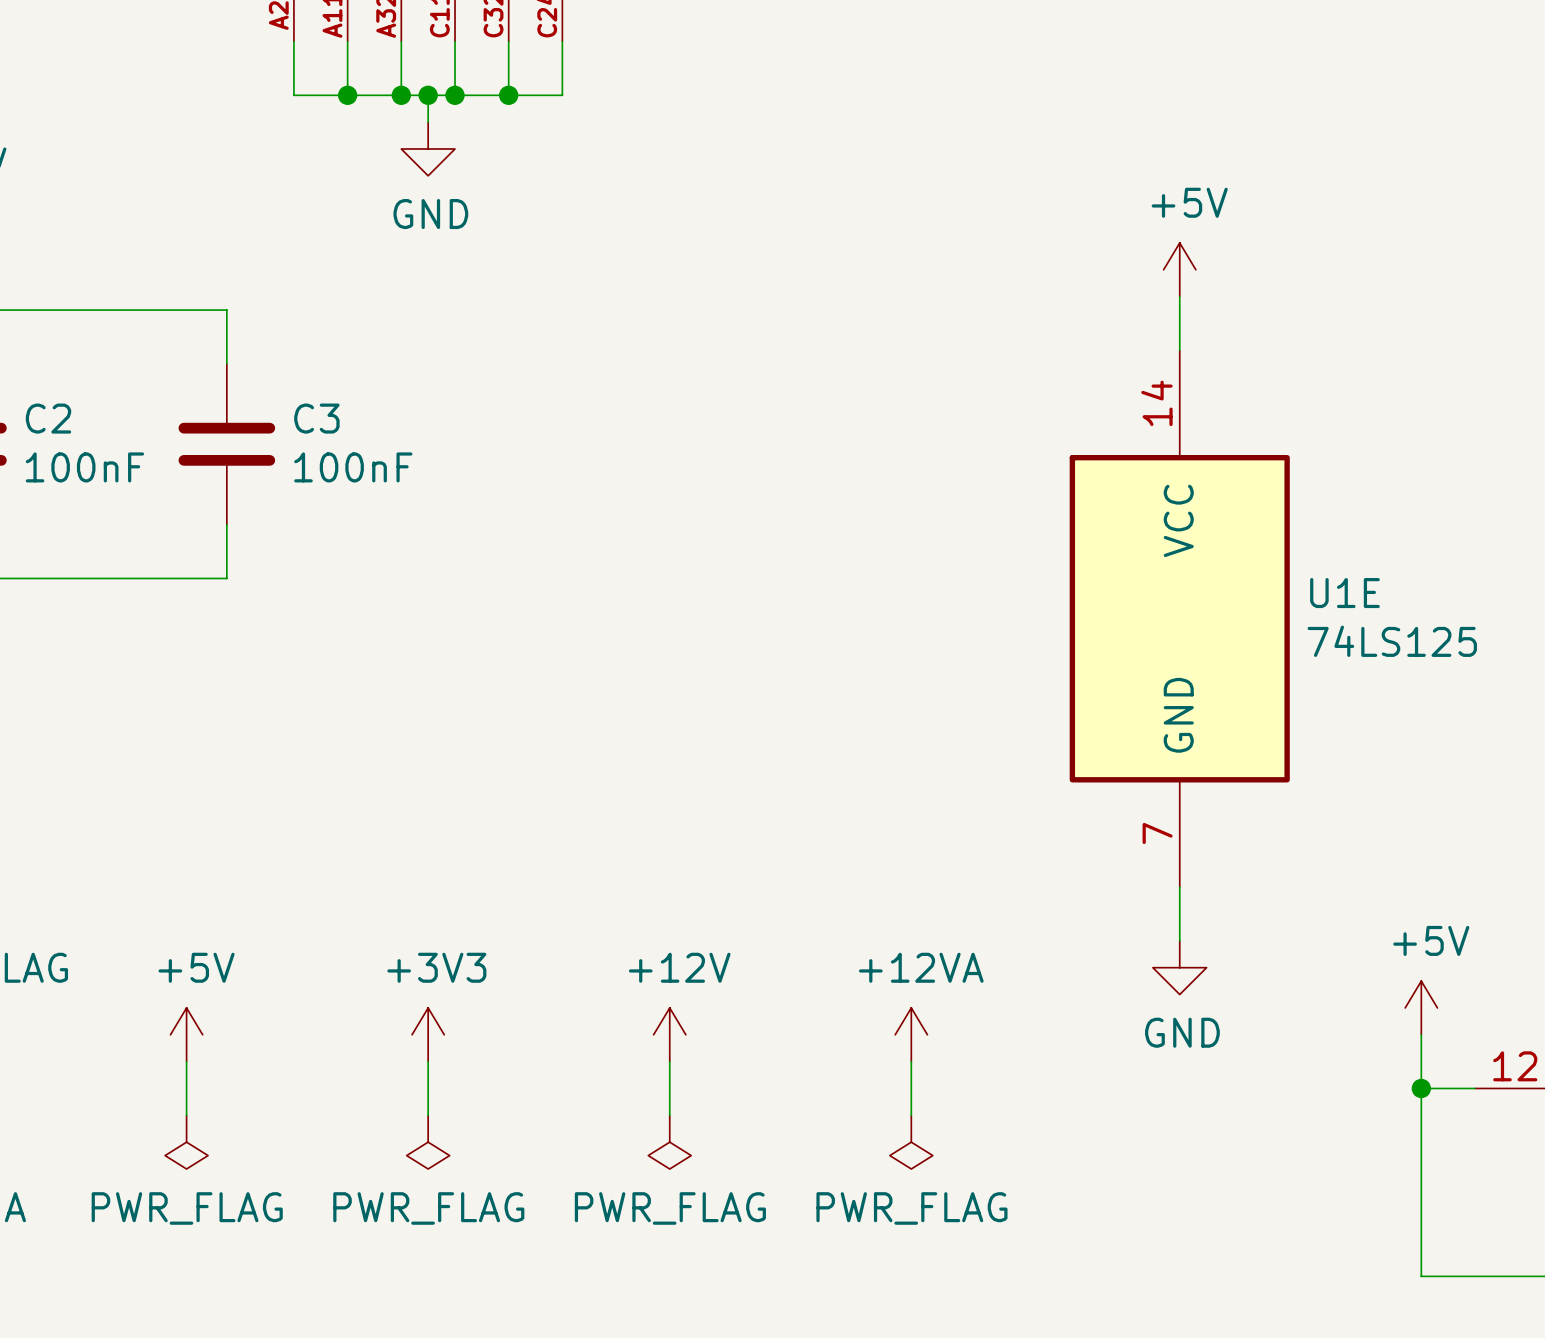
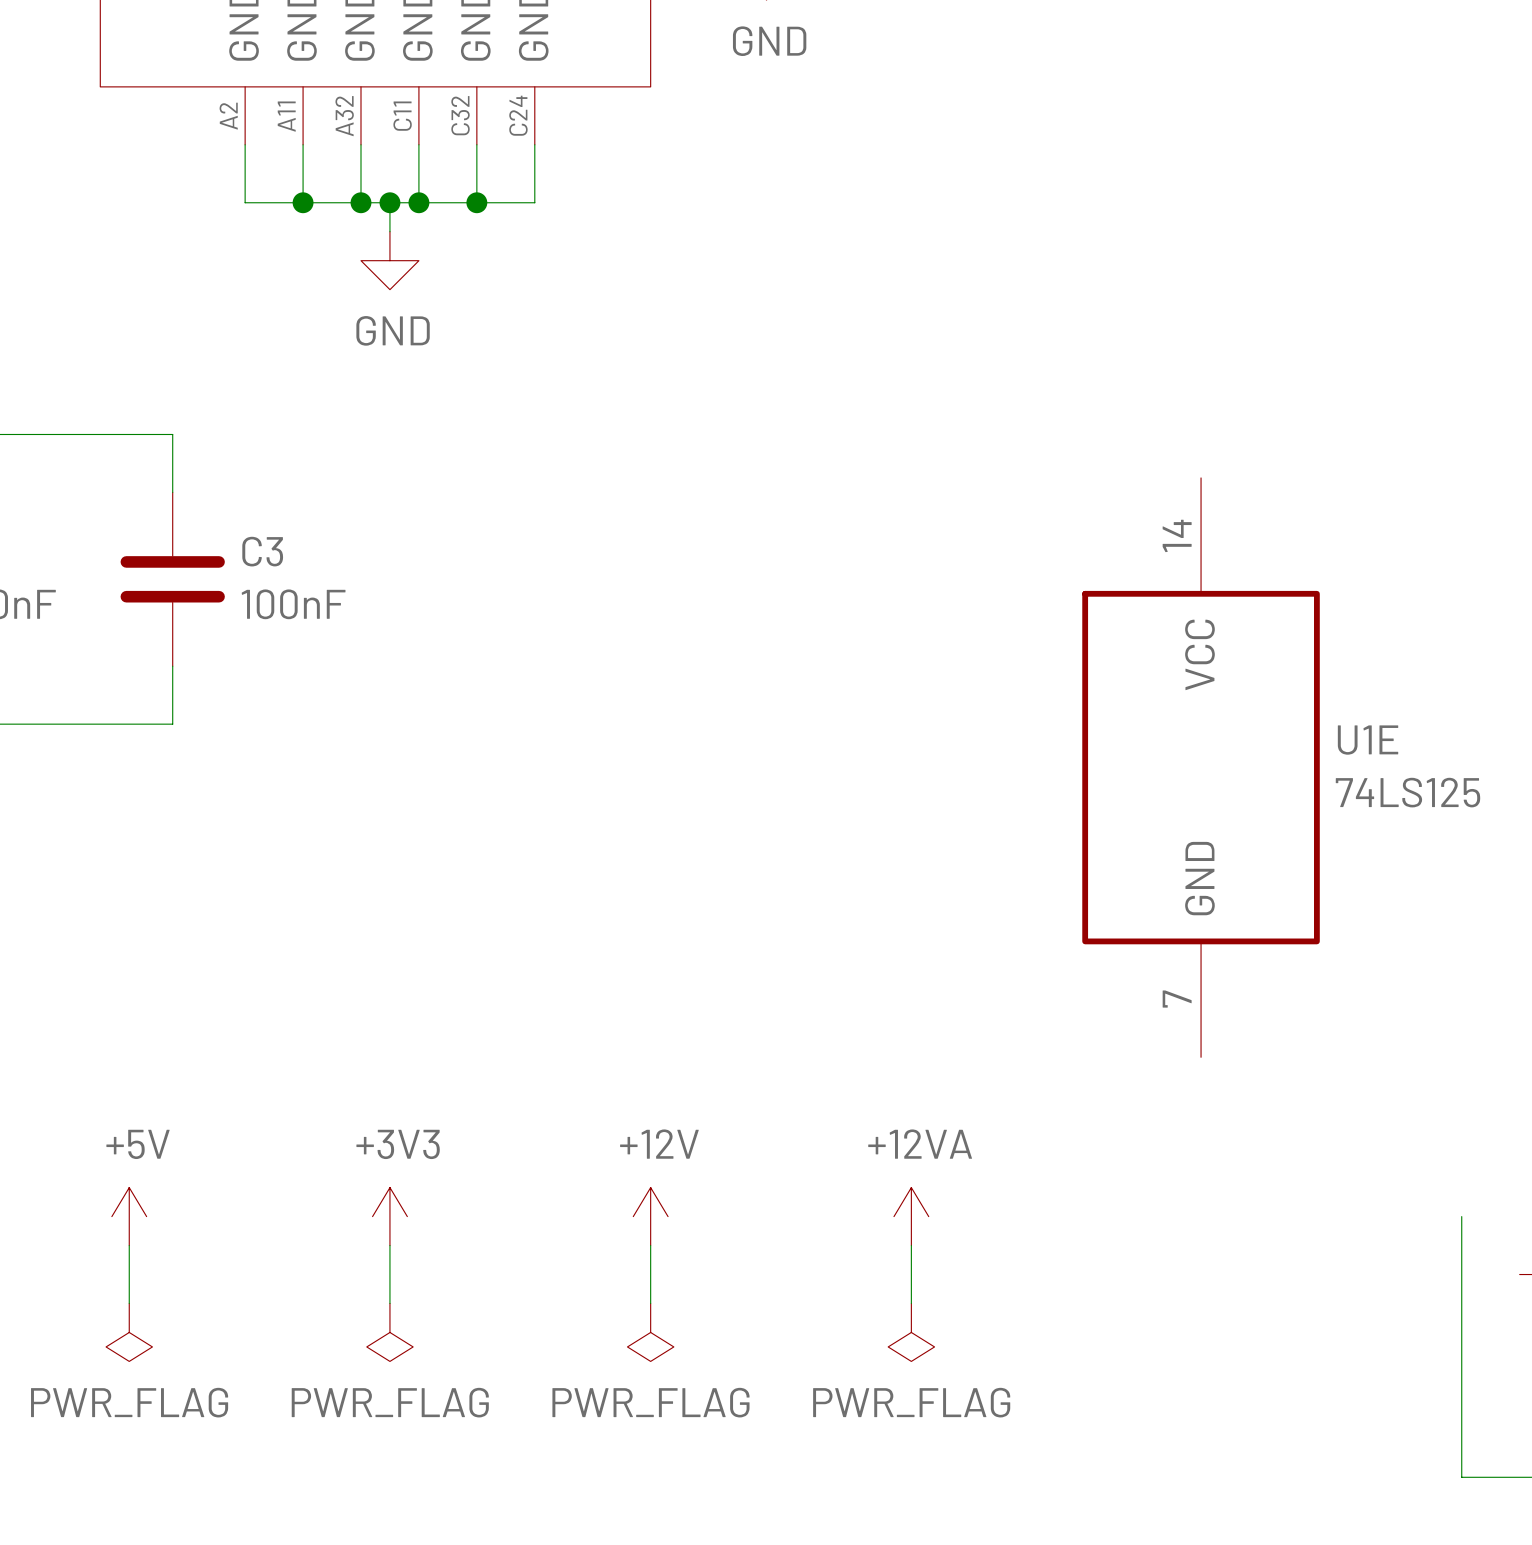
power symbol: +5V (1179, 269) -> none
wire: (1179, 296) (1179, 350) -> none
wire: (1179, 887) (1179, 940) -> none
power symbol: GND (1179, 967) -> none
power symbol: +5V (1421, 1007) -> none
wire: (1421, 1088) (1475, 1088) -> none
junction: (1421, 1088) -> none

